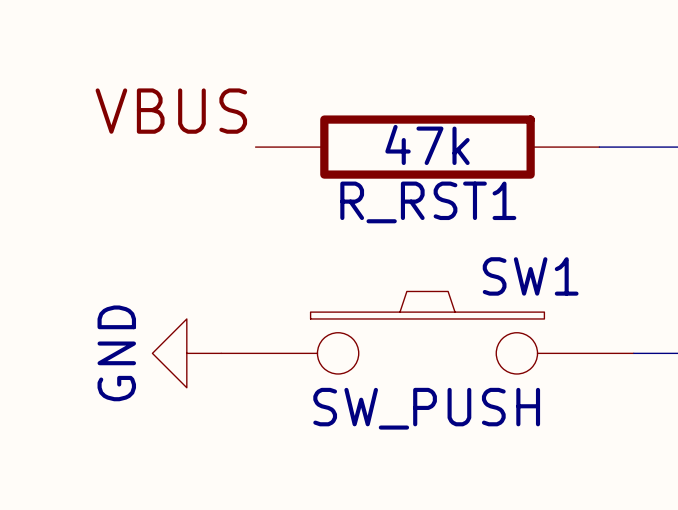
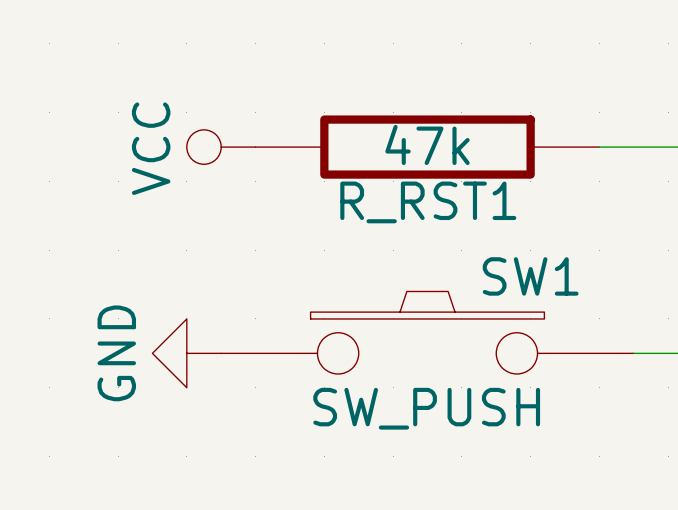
label: VBUS (171, 111) -> none
power symbol: none -> VCC (221, 147)

